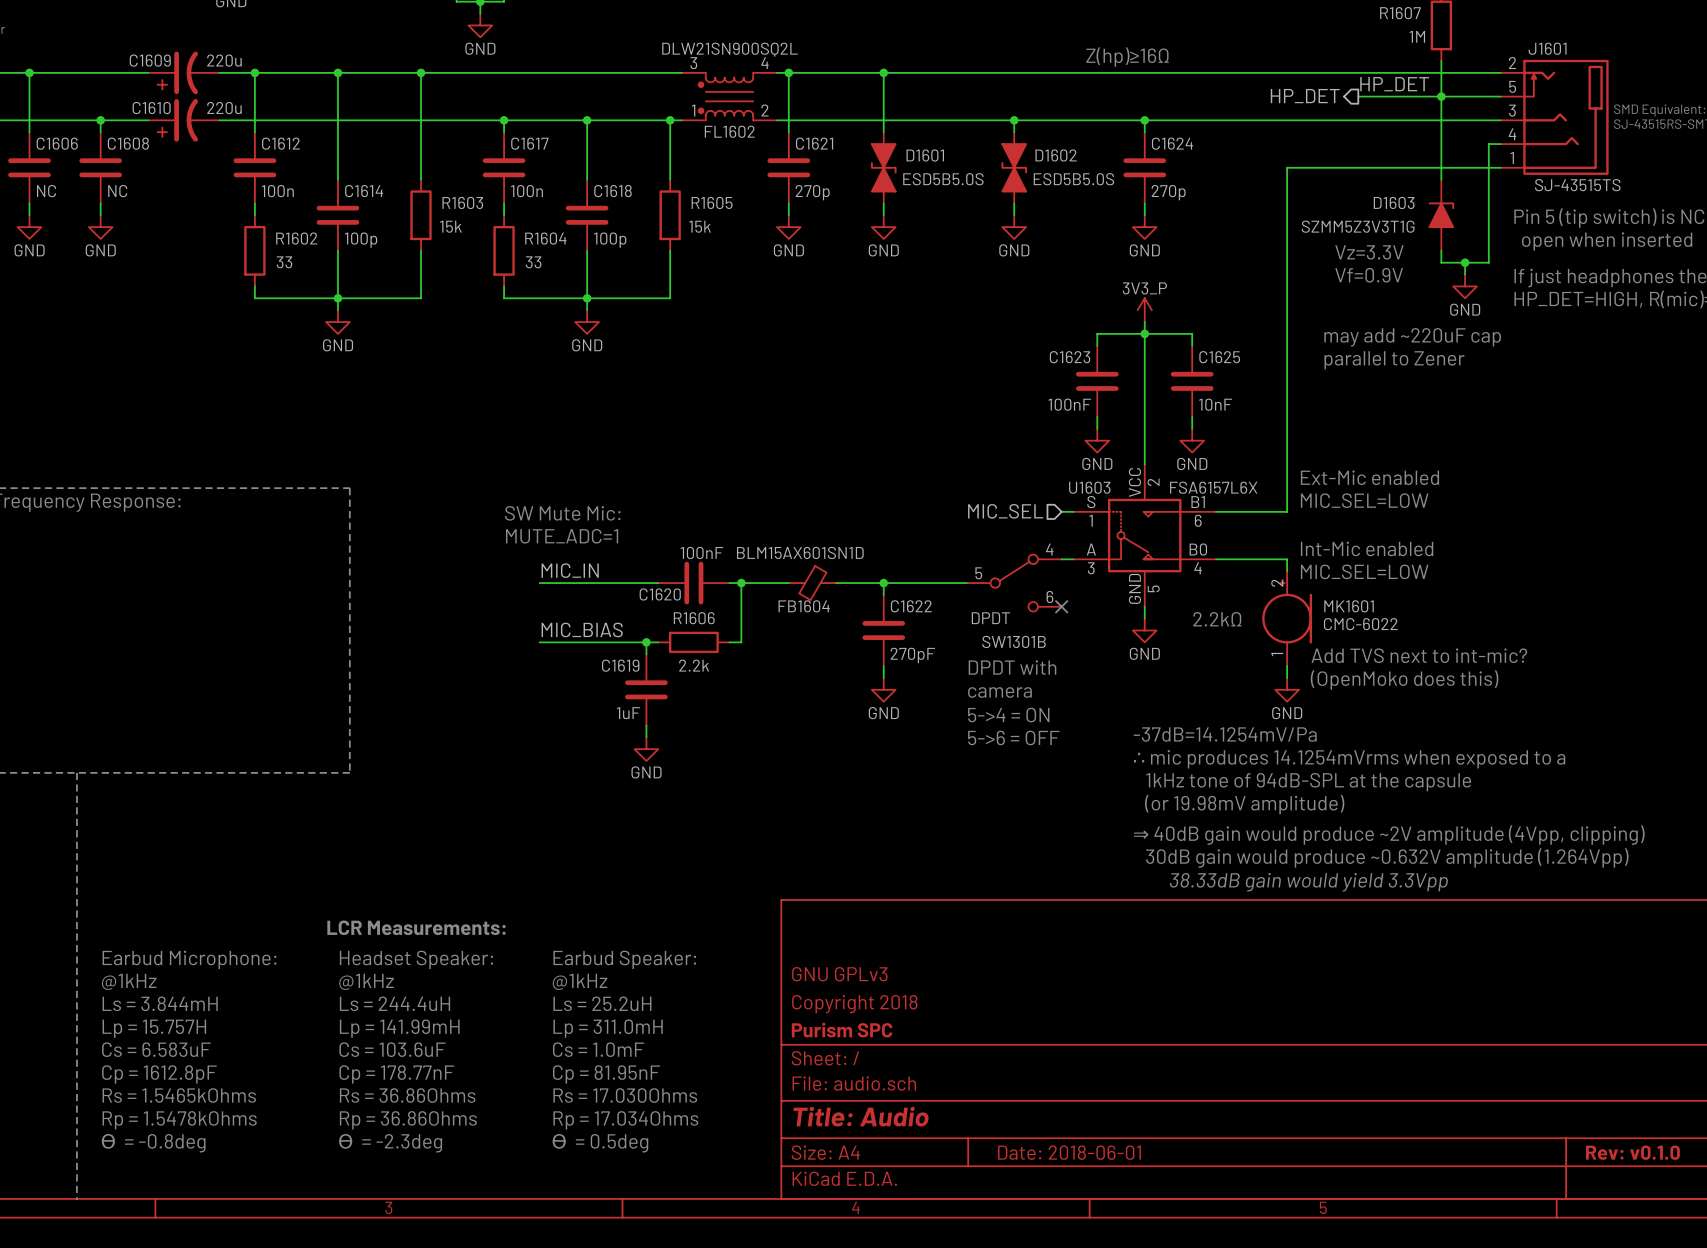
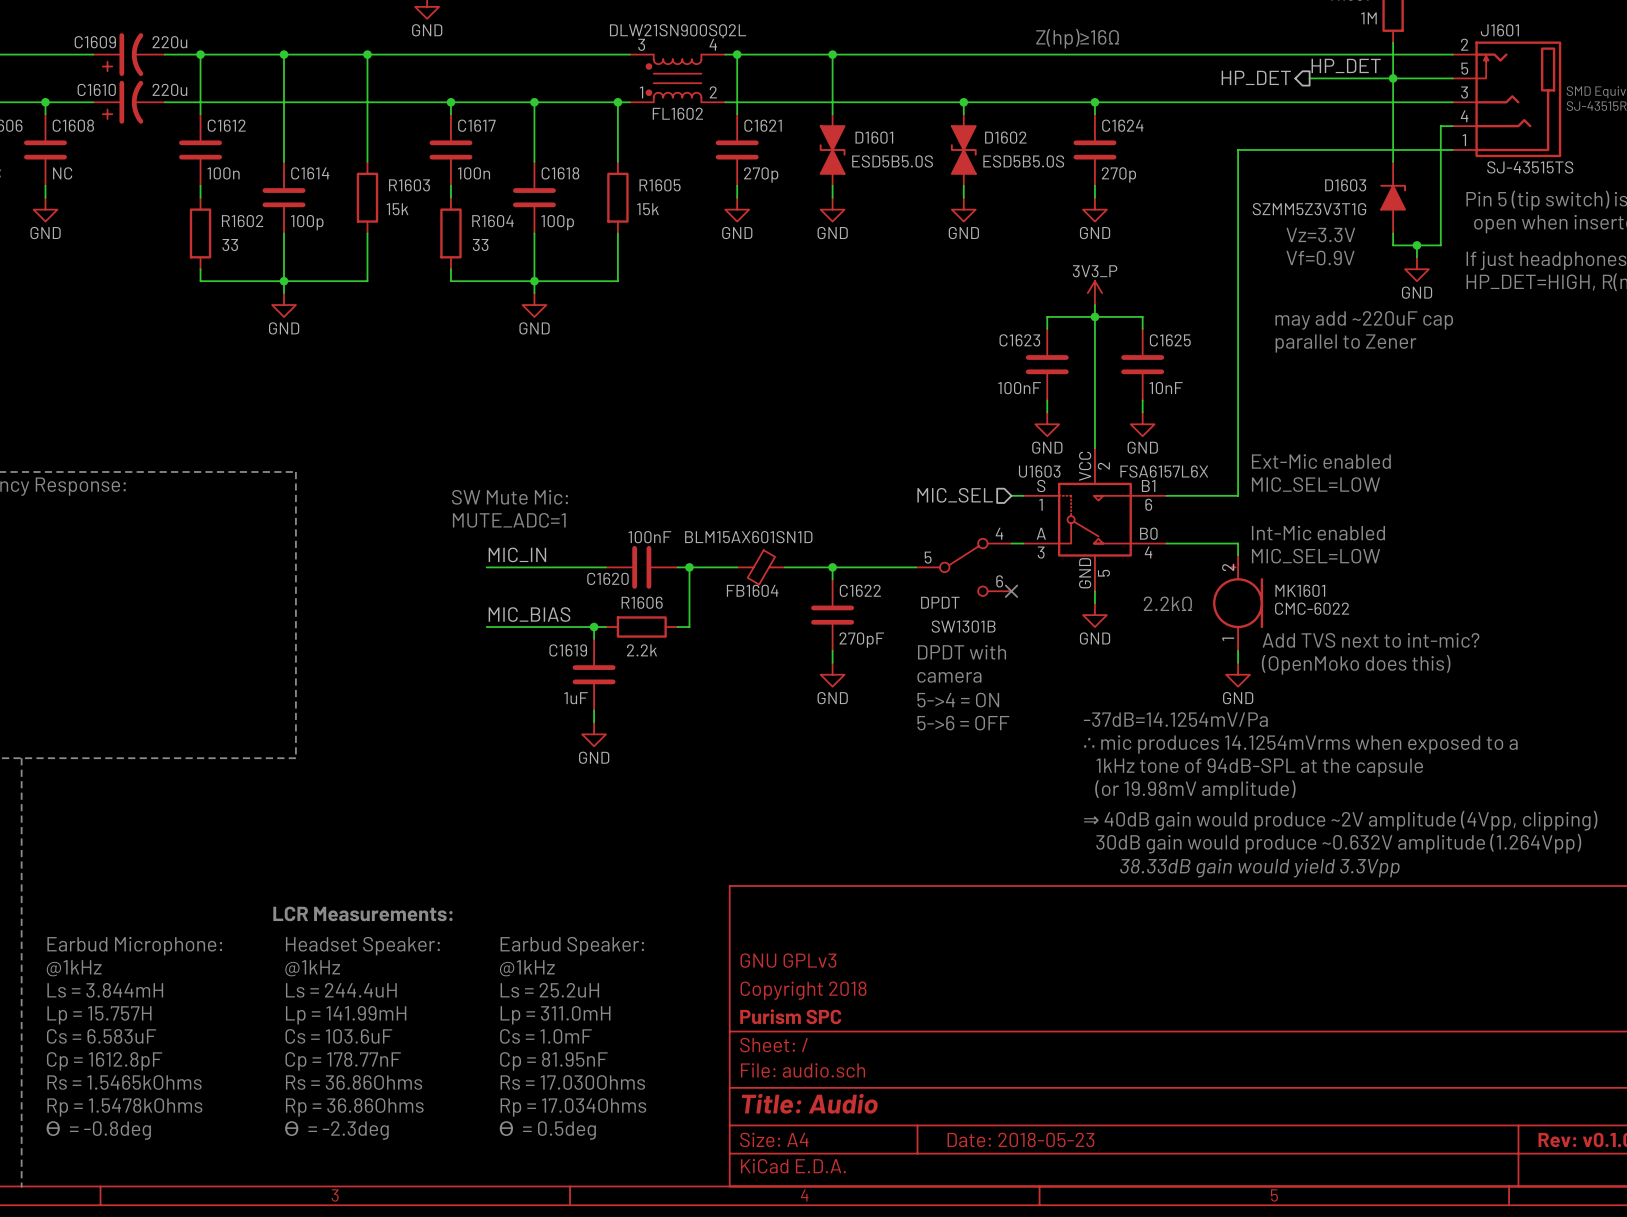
title block: Date: 2018-06-01 (1069, 1152) -> Date: 2018-05-23 (1020, 1139)

